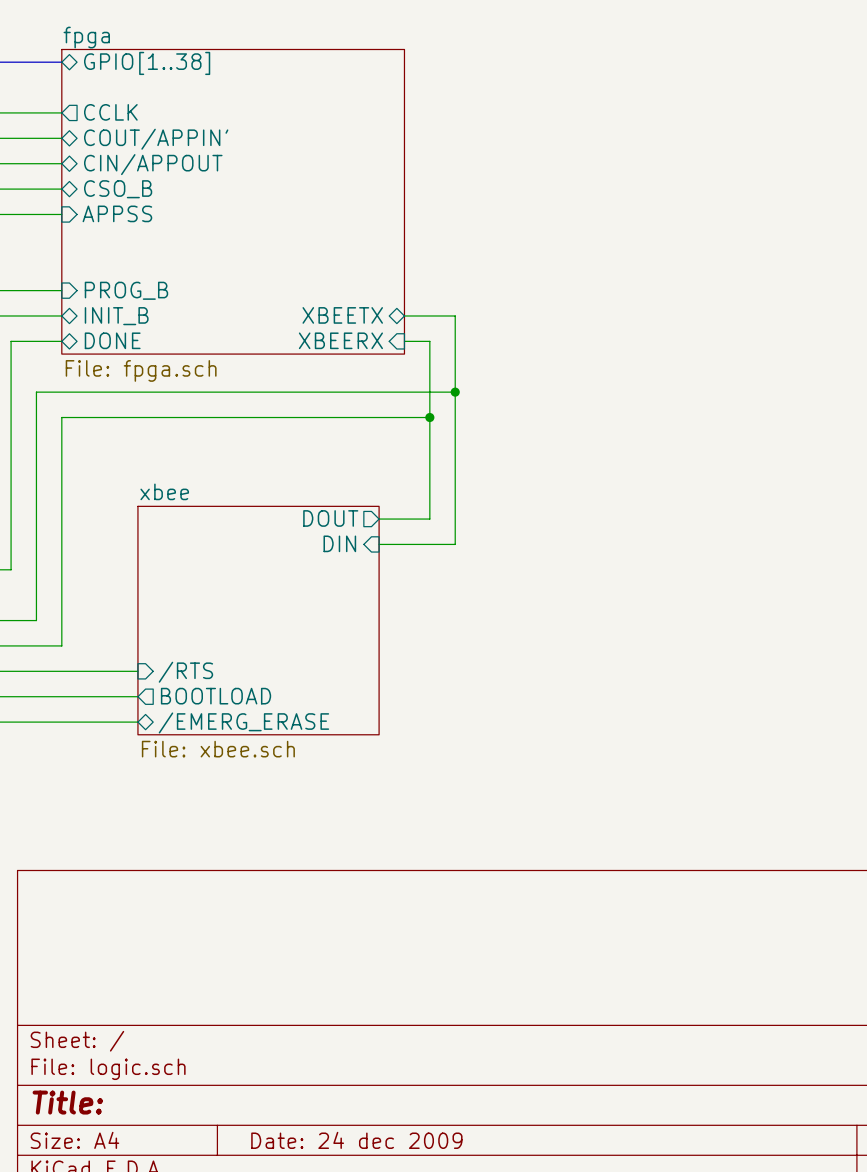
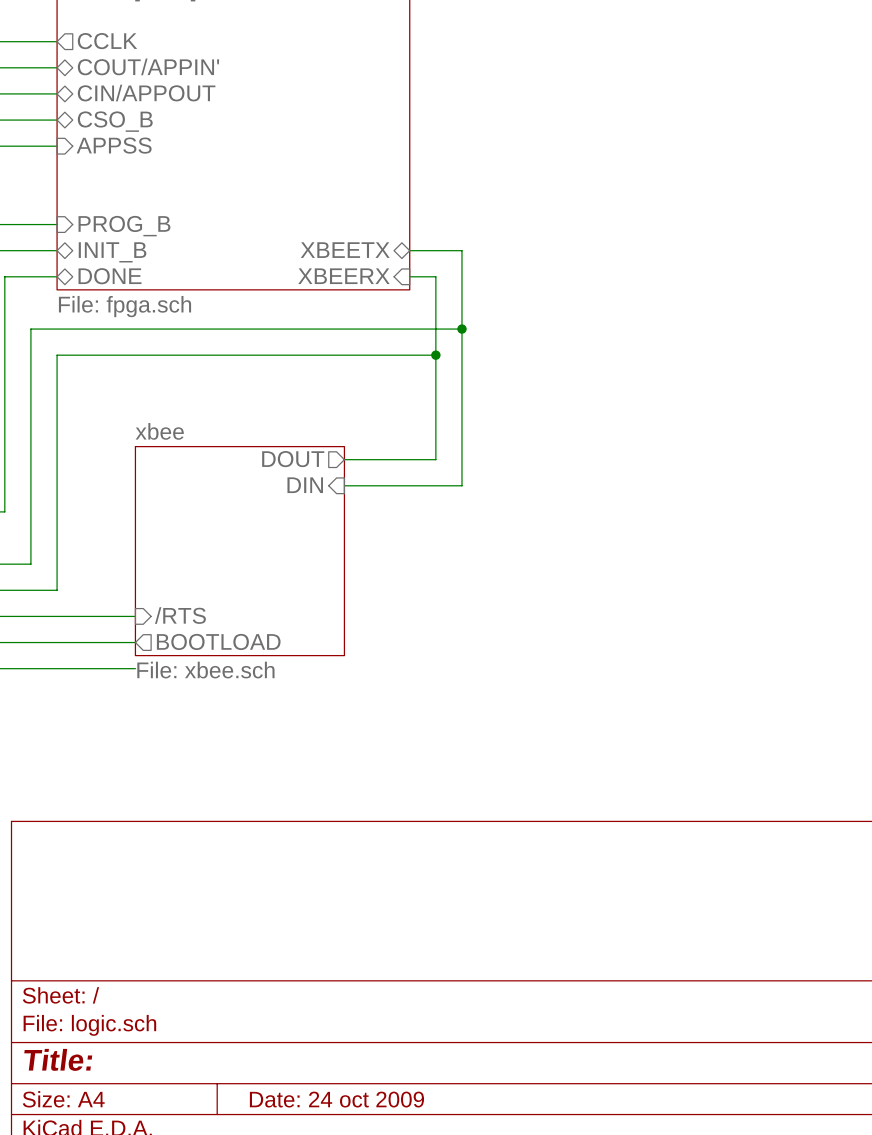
sheet pin position: DOUT (330, 518) -> DOUT (293, 459)
wire: none -> (344, 459) (383, 459)
sheet pin position: DIN (339, 543) -> DIN (305, 485)
wire: none -> (344, 485) (383, 485)
sheet xbee: none -> File: xbee.sch (239, 551)
sheet xbee: File: xbee.sch (258, 620) -> none
sheet pin: /EMERG_ERASE (243, 722) -> none
title block: Date: 24 dec 2009 (356, 1140) -> Date: 24 oct 2009 (336, 1099)

